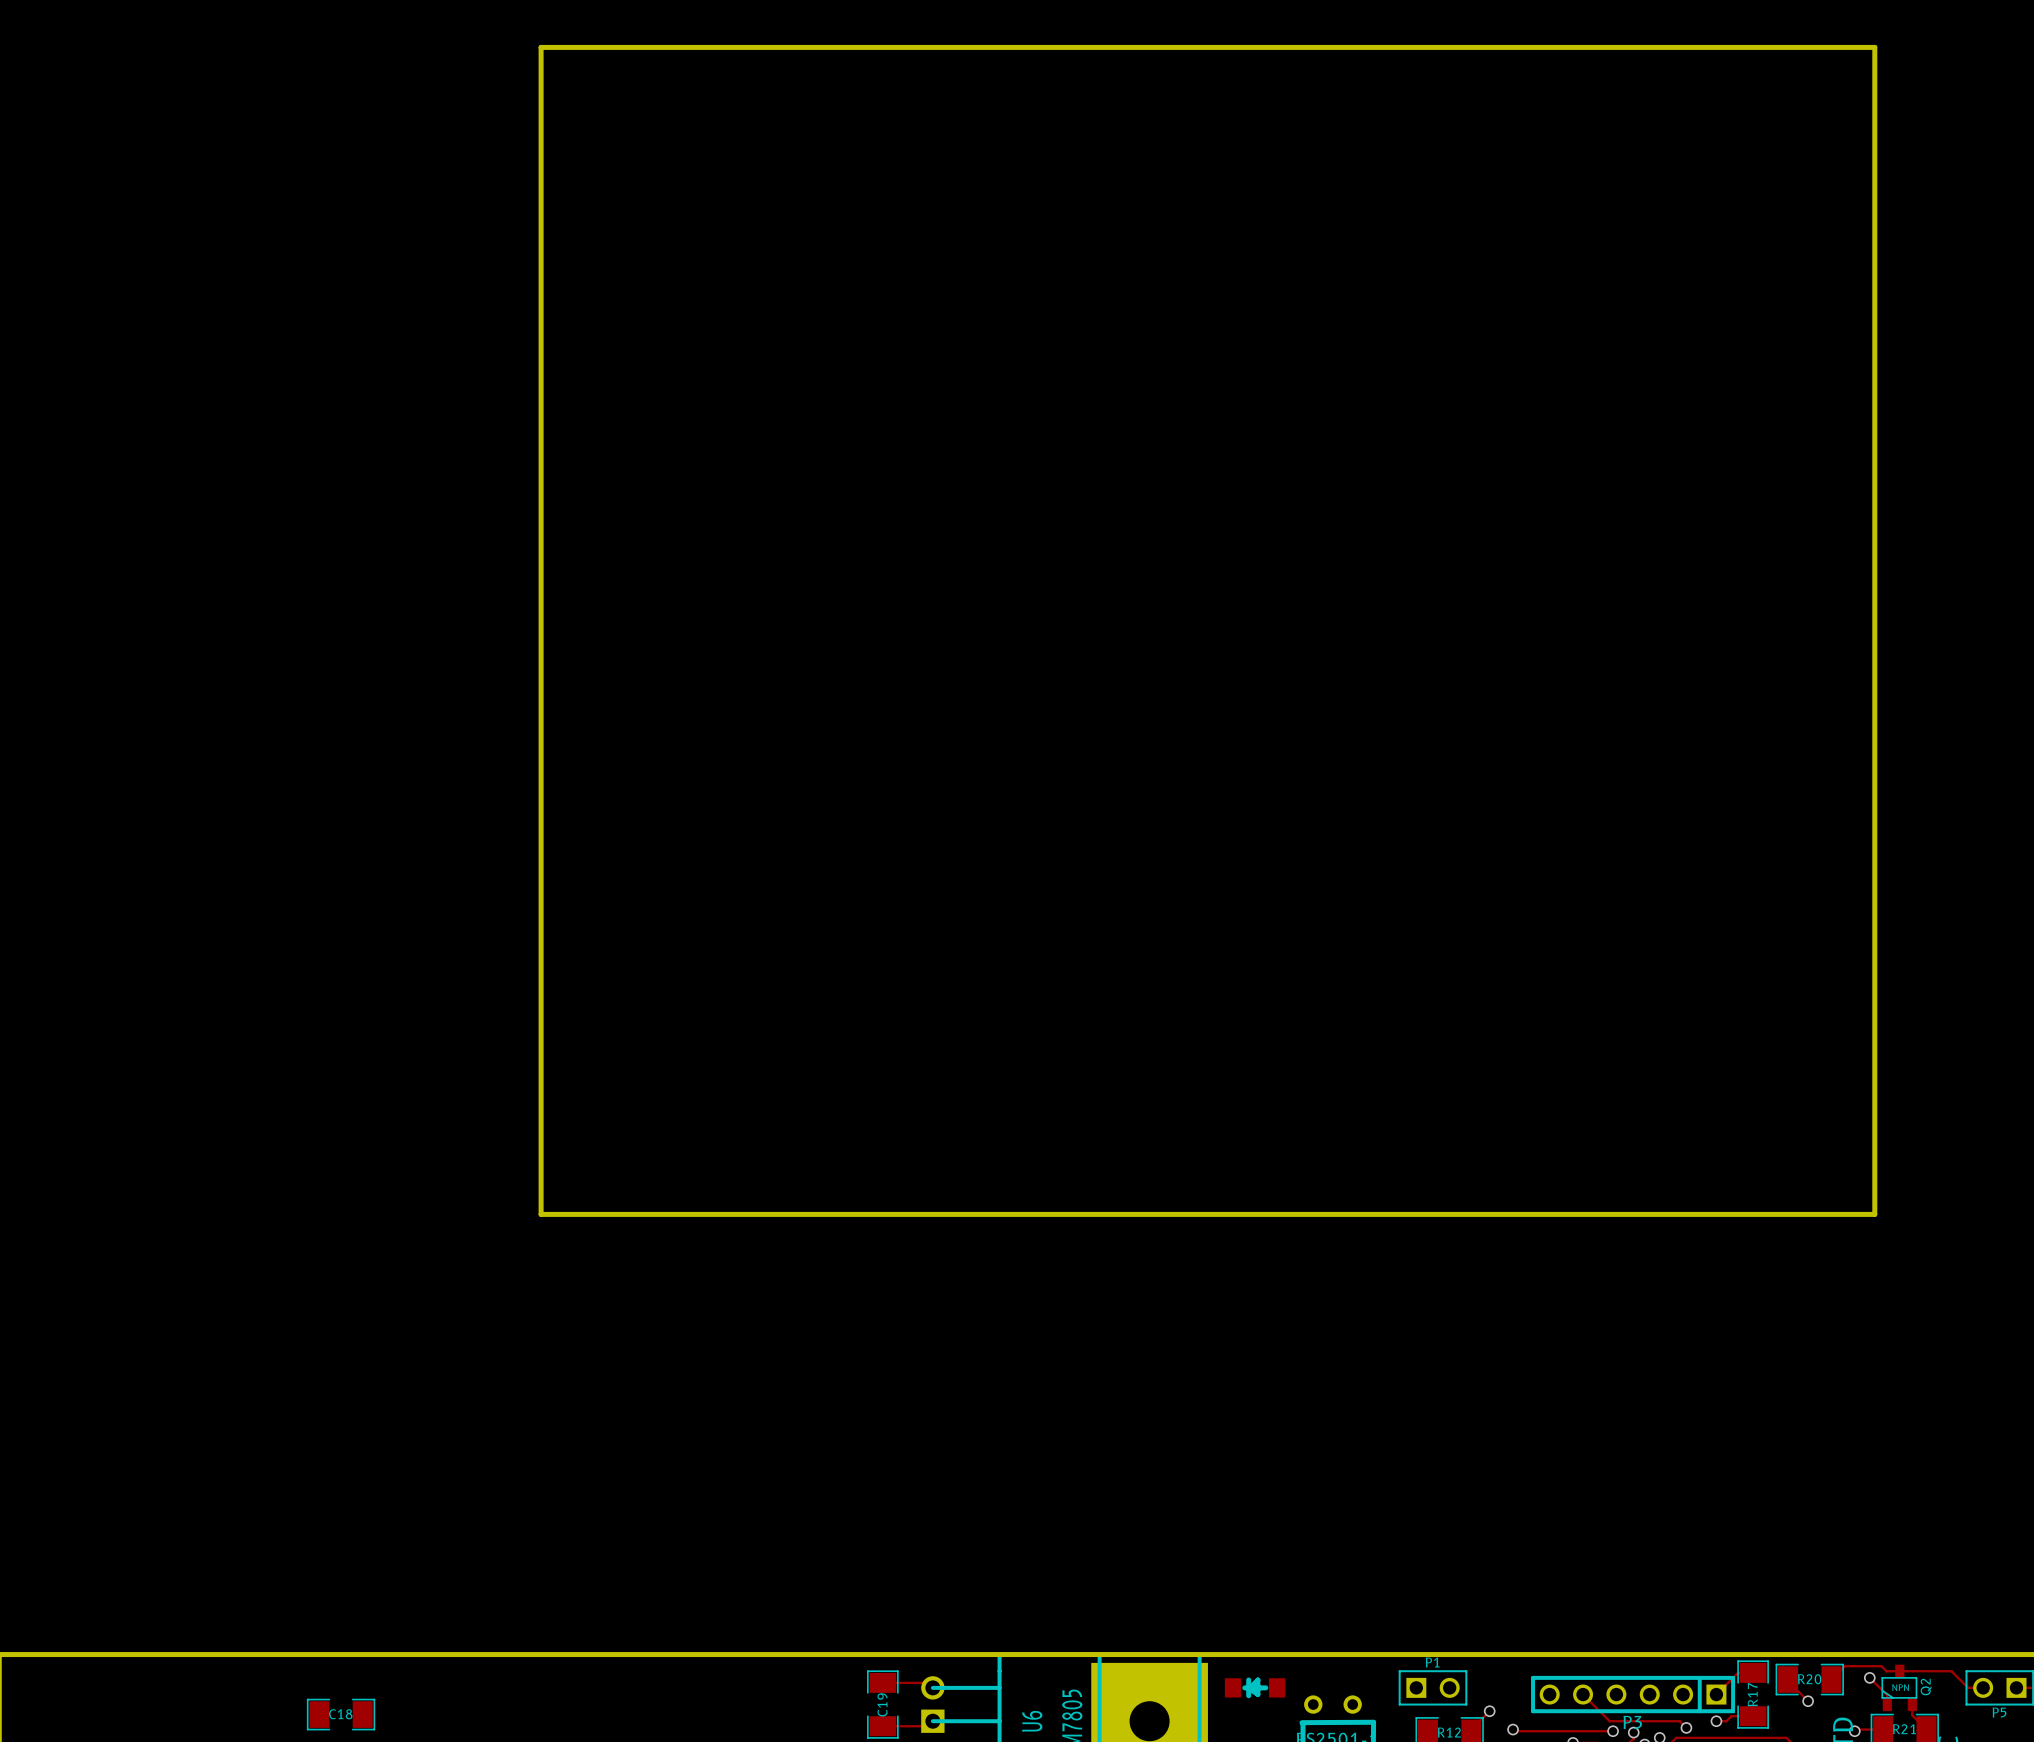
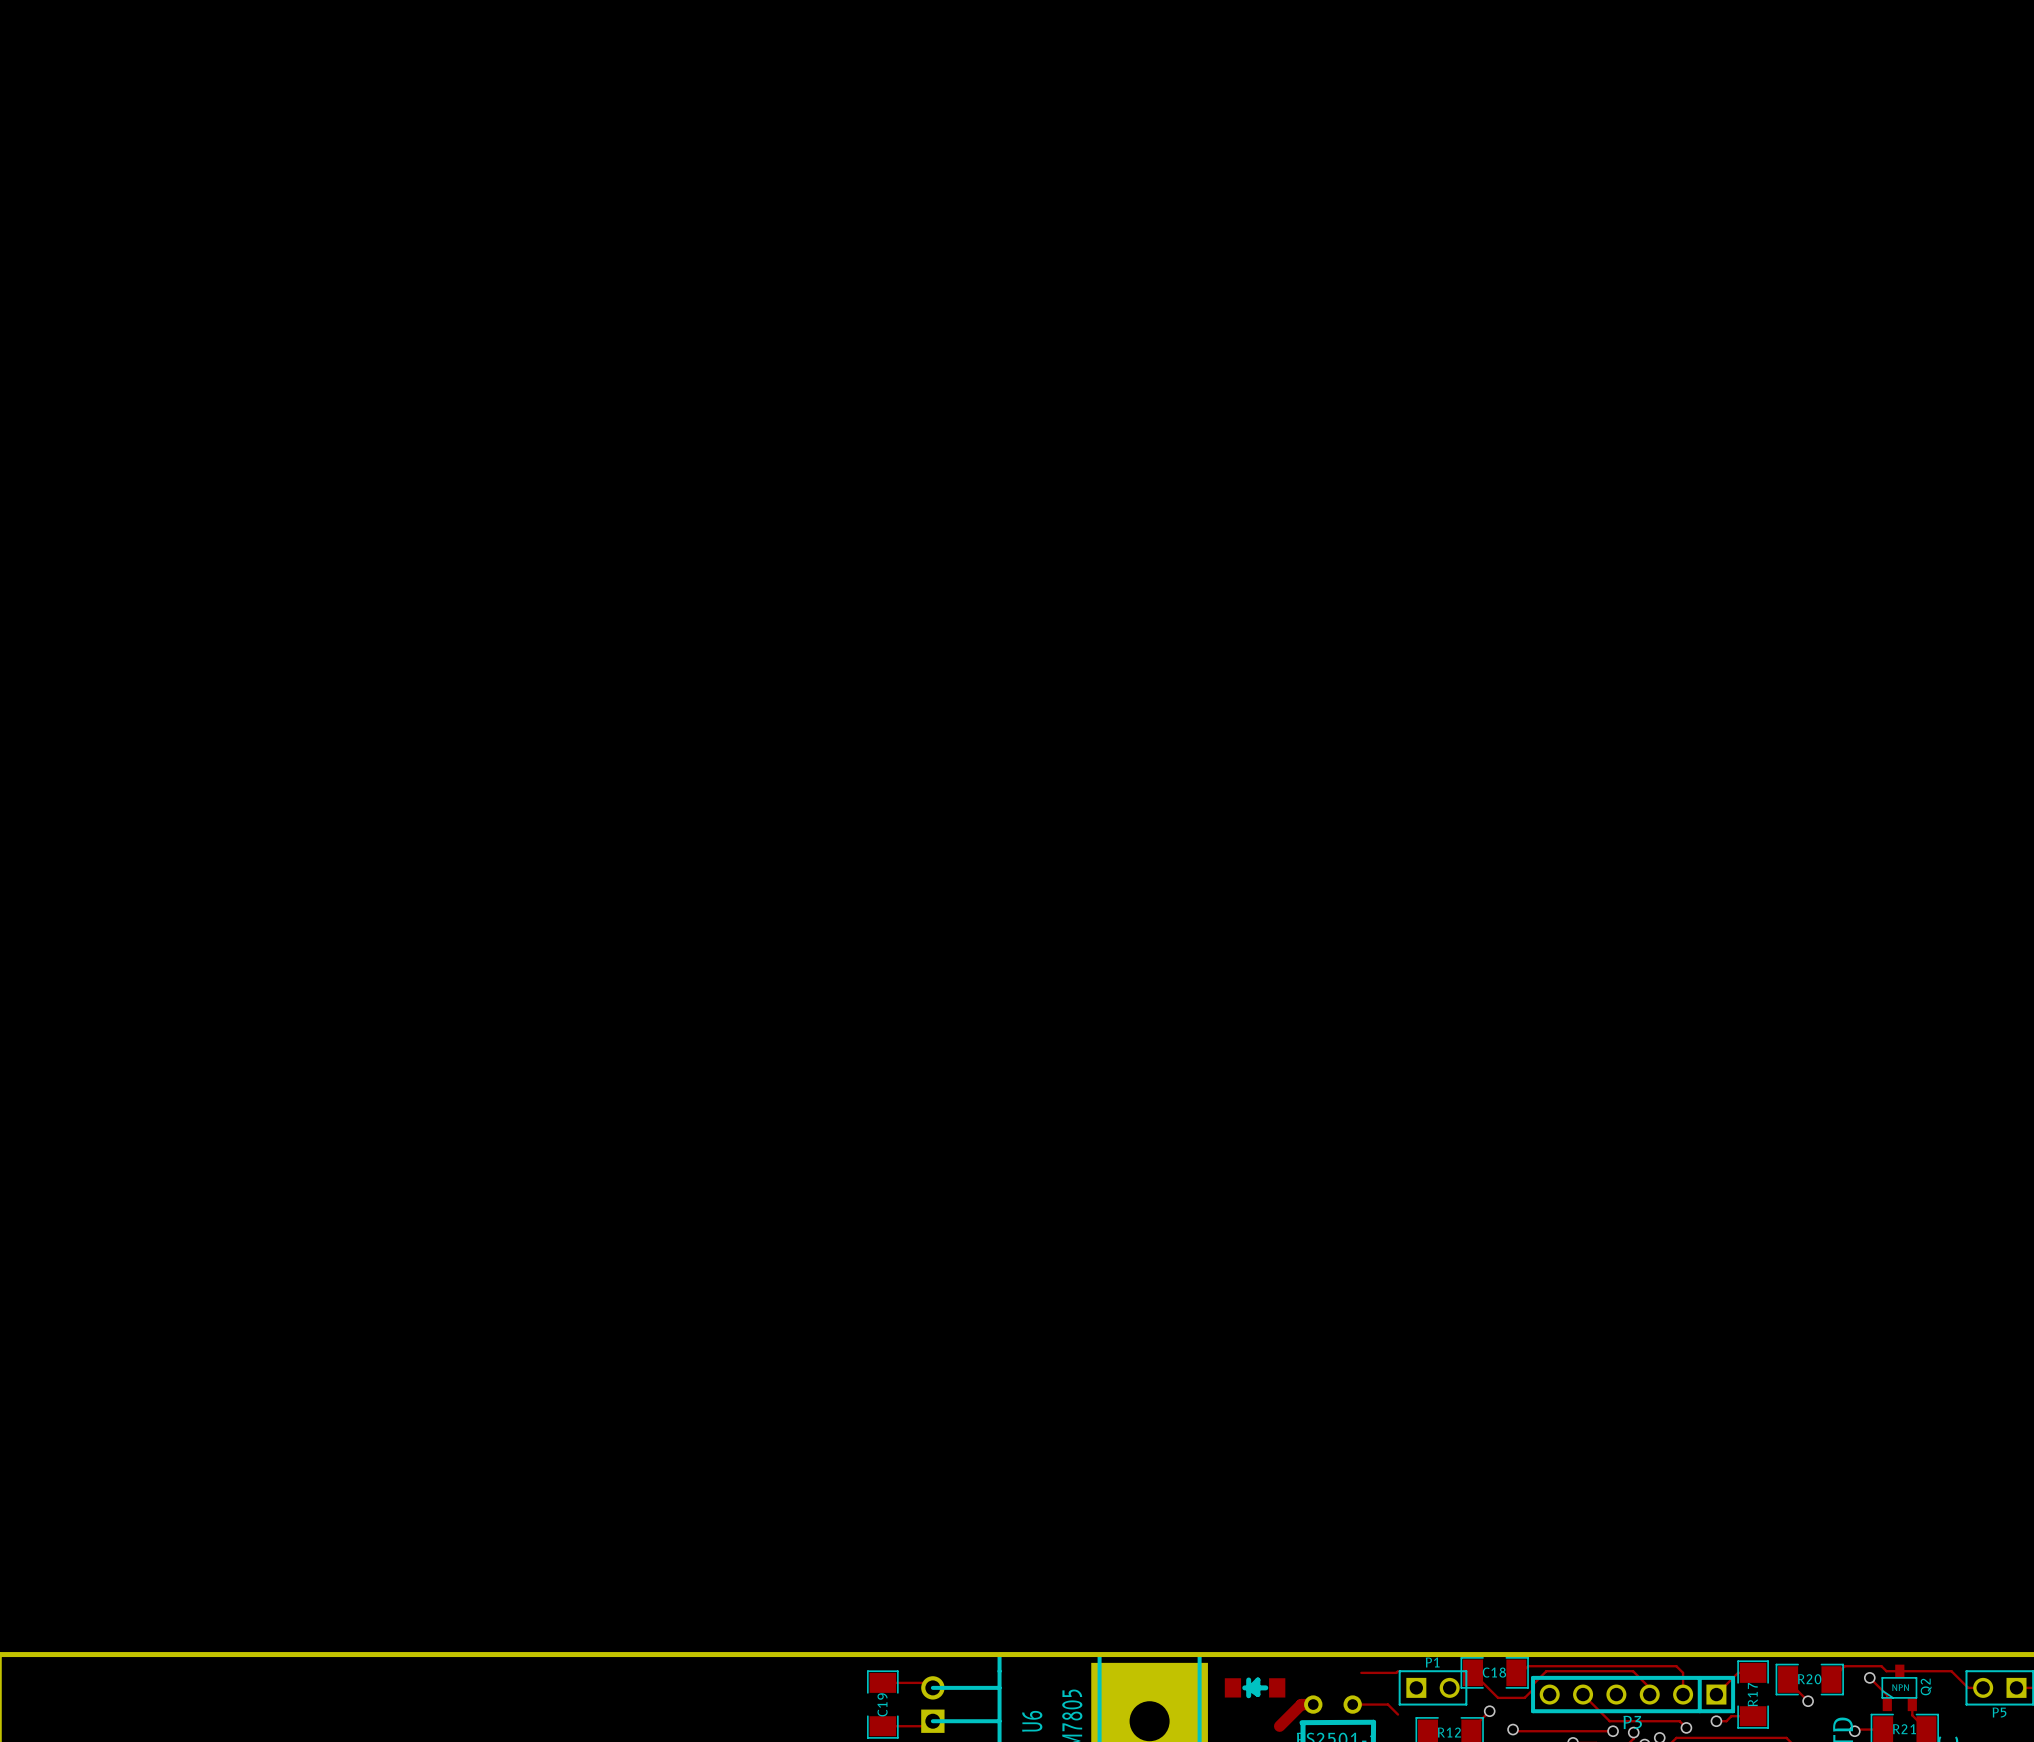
board edge: (541, 47) (1874, 47) (1874, 1214) (541, 1214) (541, 47) -> none
track: none -> (1398, 1671) (1396, 1672) (1361, 1672)
track: none -> (1473, 1672) (1498, 1697) (1524, 1697) (1533, 1689) (1533, 1684) (1546, 1671) (1633, 1671) (1649, 1687) (1649, 1694)
track: none -> (1516, 1672) (1521, 1672) (1528, 1666) (1676, 1666) (1683, 1672) (1683, 1694)
track: none -> (1313, 1704) (1301, 1704) (1279, 1726)
track: none -> (1352, 1704) (1387, 1704) (1398, 1714)
C18 position: (341, 1714) -> (1494, 1672)

